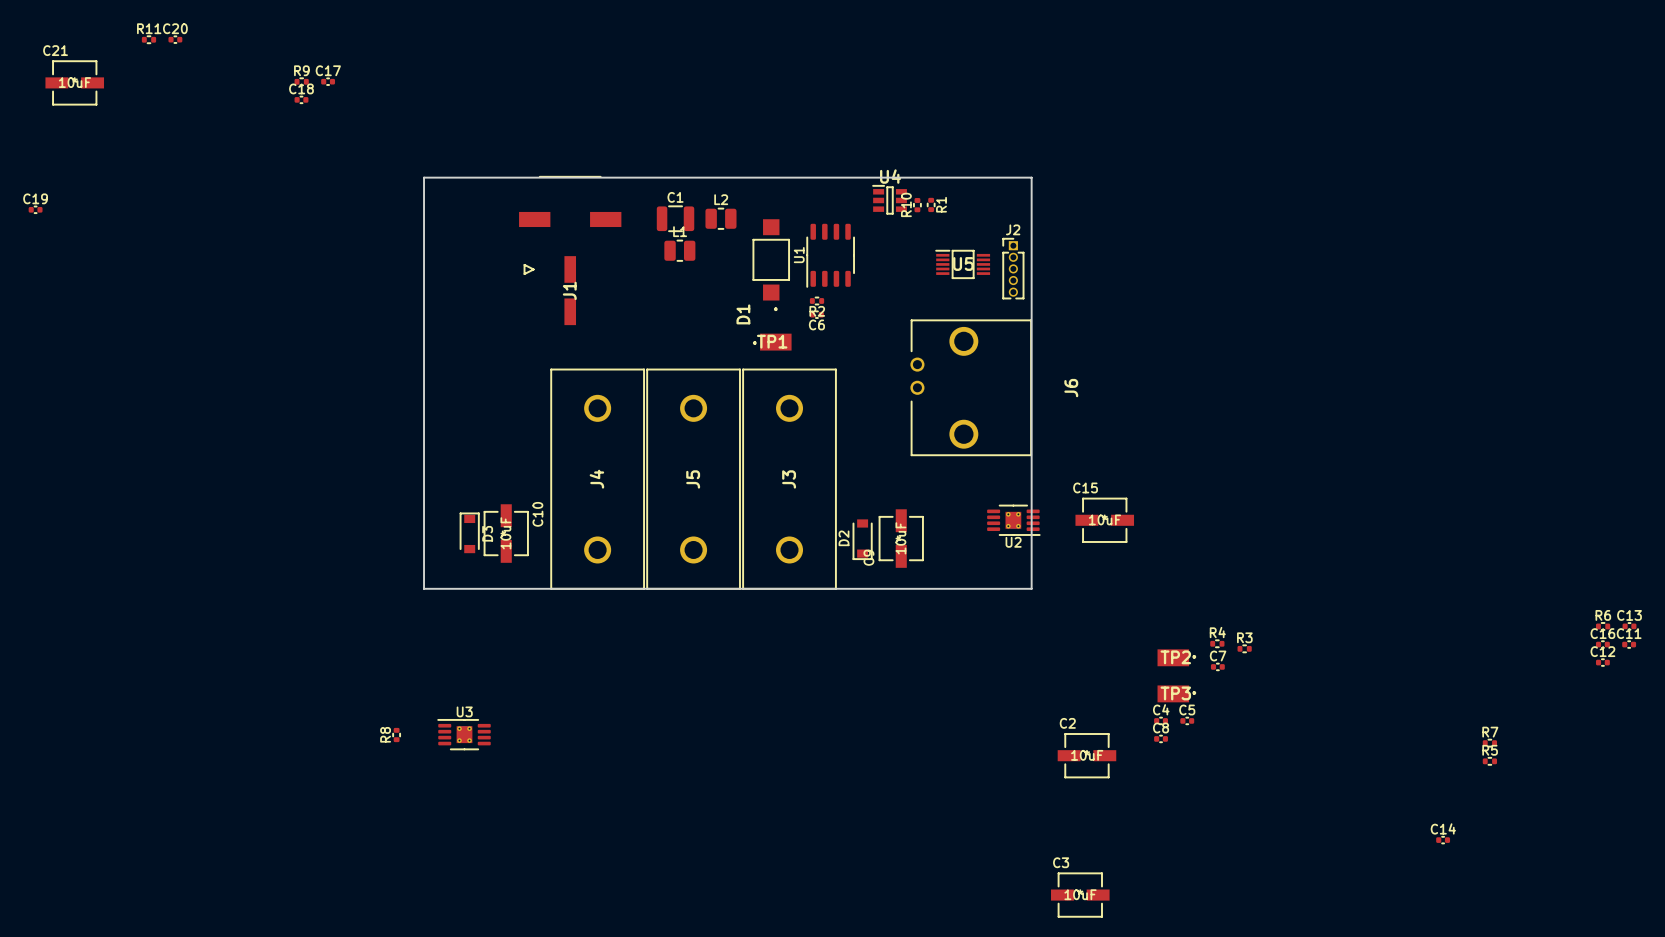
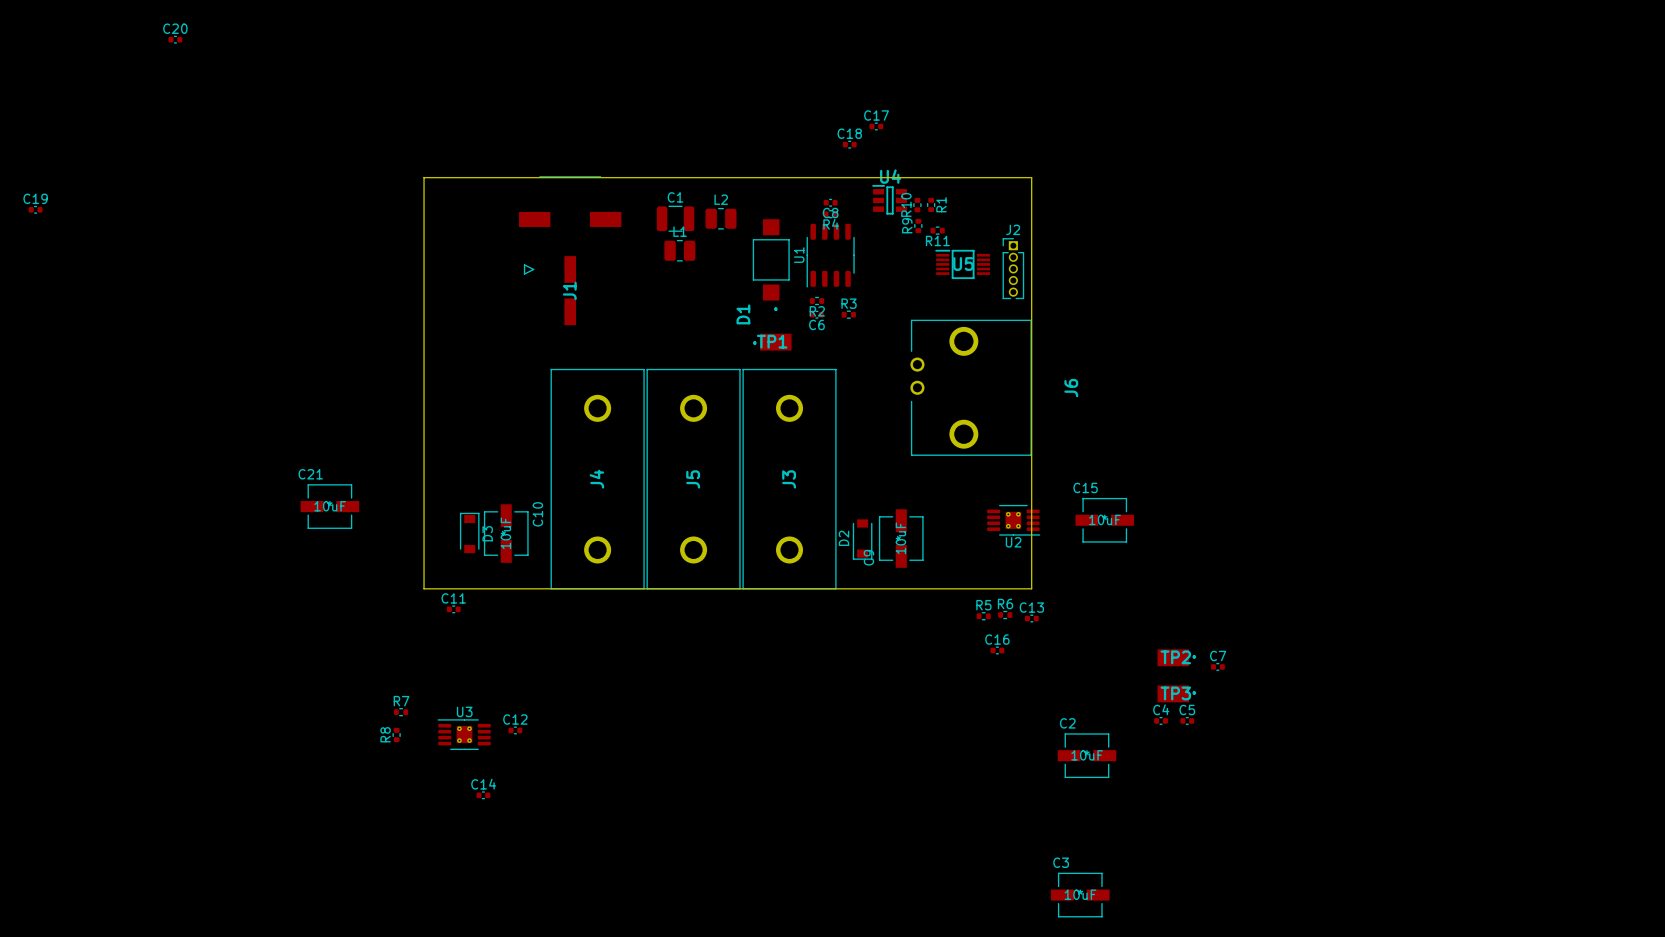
R11 name position: R11 (149, 28) -> R11 (937, 240)
R11 position: (148, 39) -> (937, 230)
R9 rotation: 0° (301, 81) -> 90° clockwise (918, 225)
R9 position: (301, 81) -> (918, 225)
C17 position: (328, 81) -> (876, 126)
C21 position: (74, 82) -> (329, 506)
C18 position: (301, 99) -> (849, 144)
R6 position: (1603, 626) -> (1005, 615)
C13 position: (1629, 626) -> (1031, 618)
R4 name position: R4 (1217, 632) -> R4 (831, 224)
R4 position: (1217, 643) -> (830, 214)
C16 position: (1602, 644) -> (997, 650)
C11 position: (1629, 644) -> (453, 609)
R3 position: (1244, 648) -> (848, 314)
C12 position: (1602, 662) -> (515, 730)
C8 name position: C8 (1161, 728) -> C8 (830, 213)
C8 position: (1161, 738) -> (830, 202)
R7 position: (1489, 743) -> (401, 712)
R5 position: (1489, 761) -> (983, 616)
C14 position: (1443, 840) -> (483, 795)

